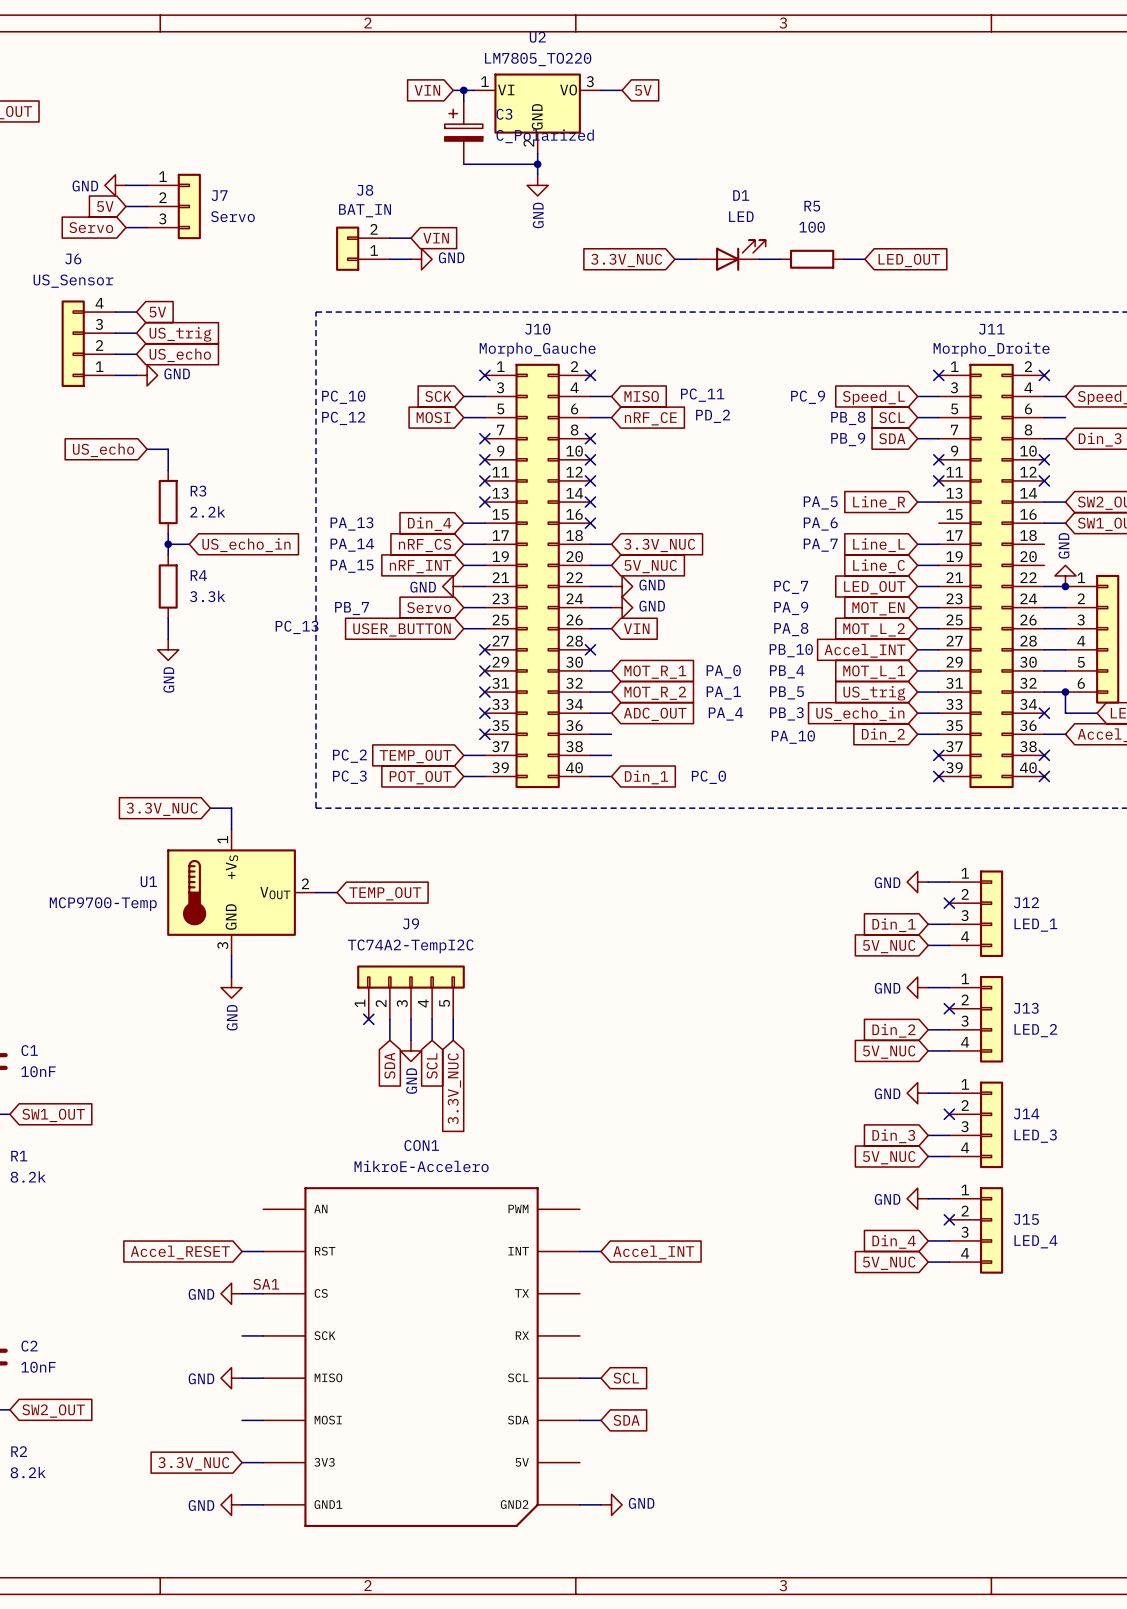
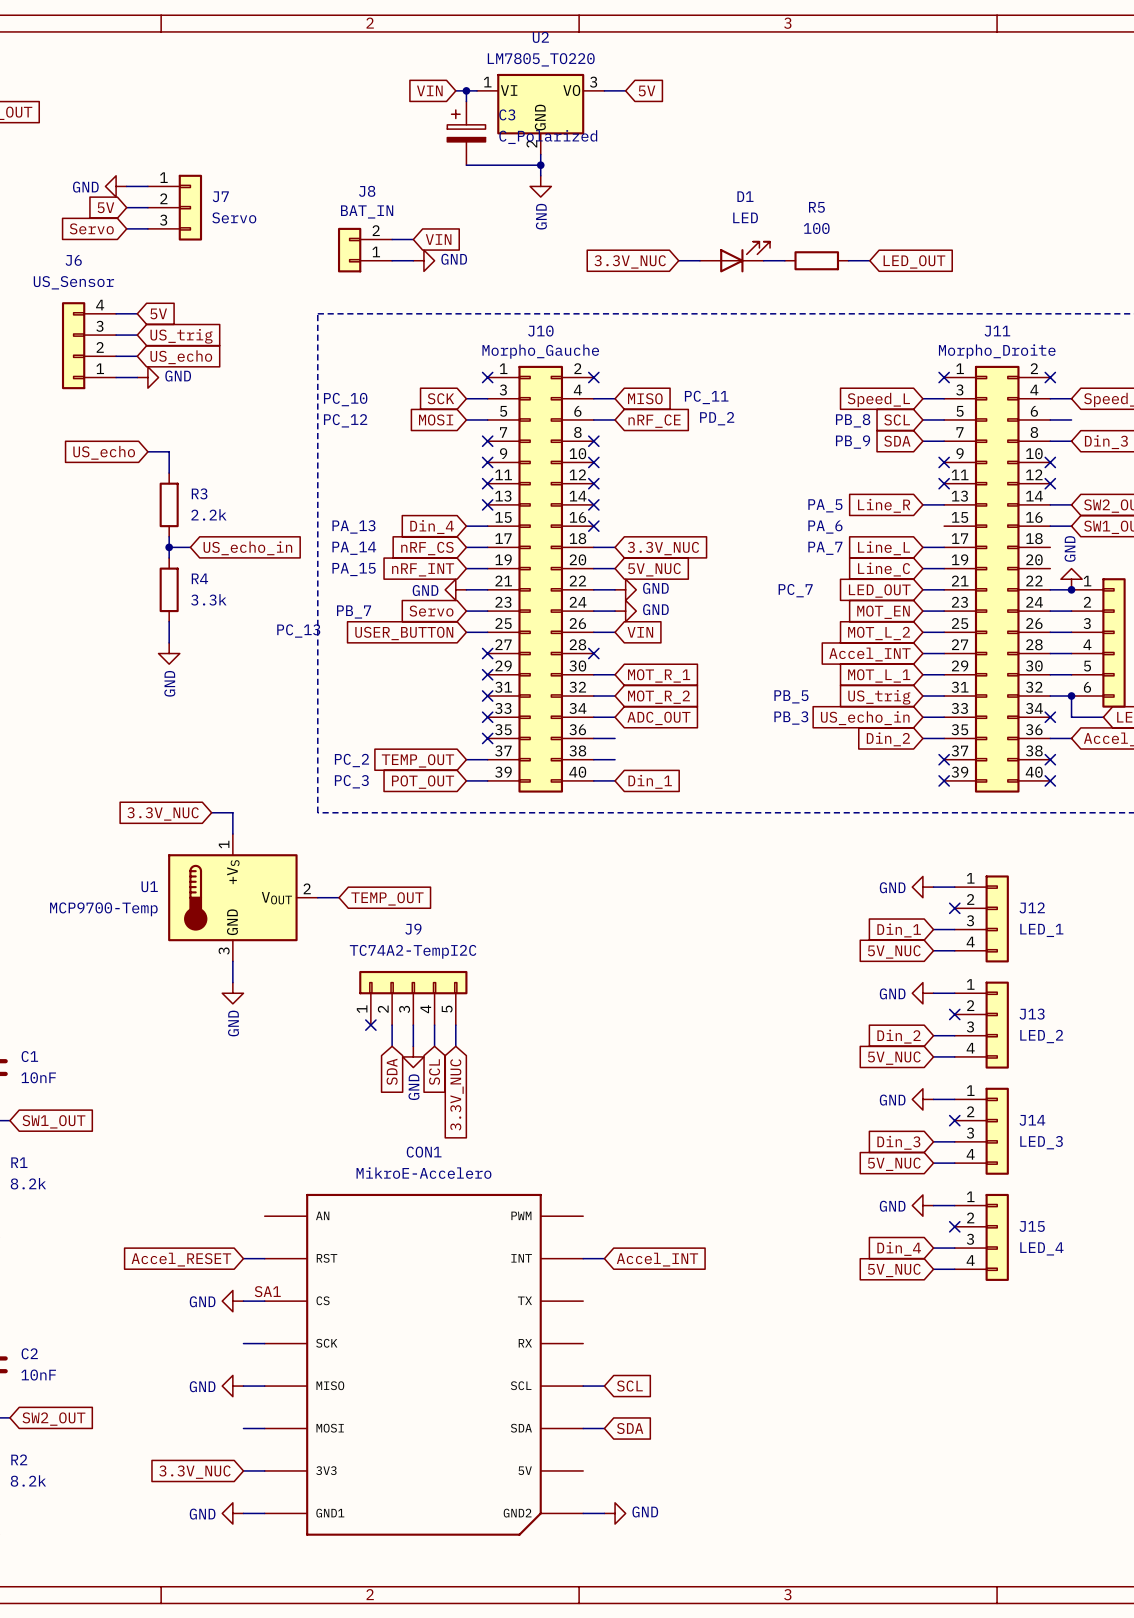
text: PC_9 (808, 397) -> none
text: PA_9 (791, 608) -> none
text: PA_8 (791, 629) -> none
text: PB_10 (791, 650) -> none
text: PA_0 (723, 671) -> none
text: PB_4 (787, 671) -> none
text: PA_1 (723, 692) -> none
text: PA_4 (725, 714) -> none
text: PA_10 (793, 737) -> none
text: PC_0 (708, 777) -> none

